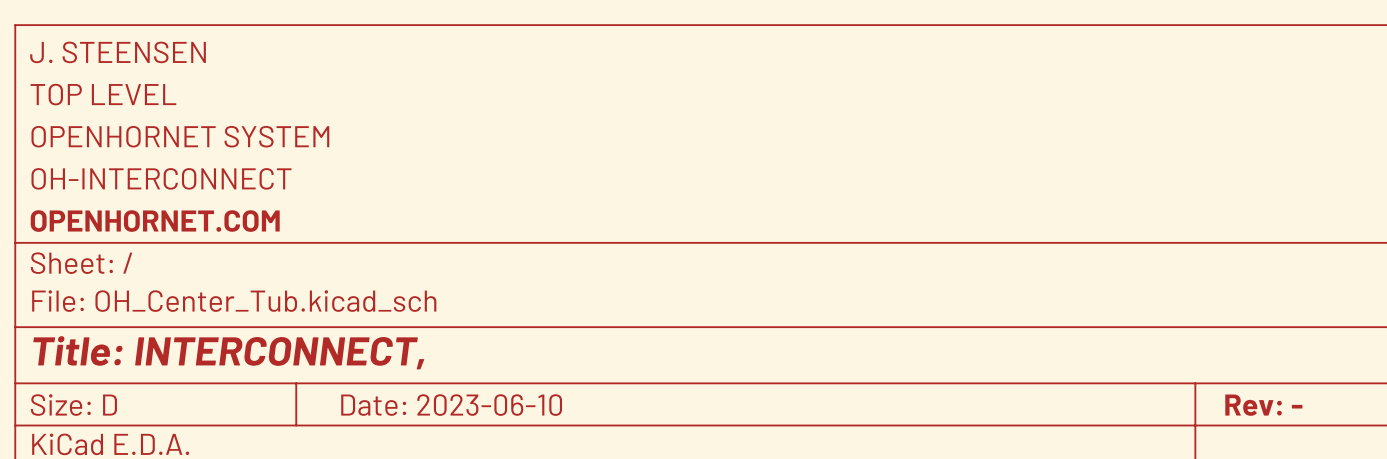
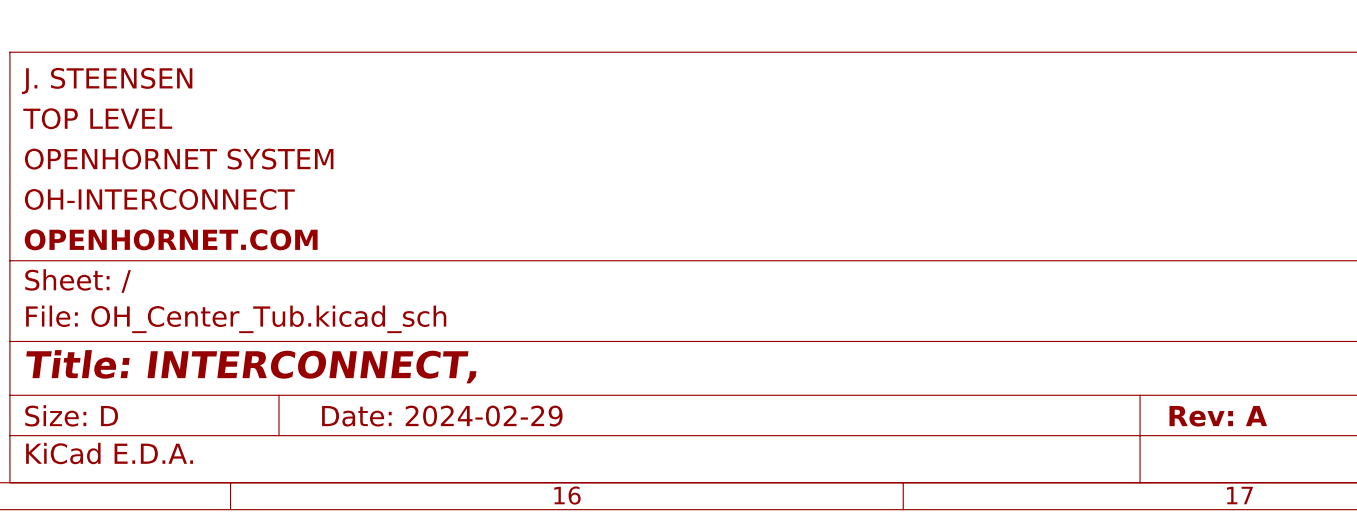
title block: Date: 2023-06-10 (451, 405) -> Date: 2024-02-29 (442, 416)
title block: Rev: - (1263, 405) -> Rev: A (1218, 416)

